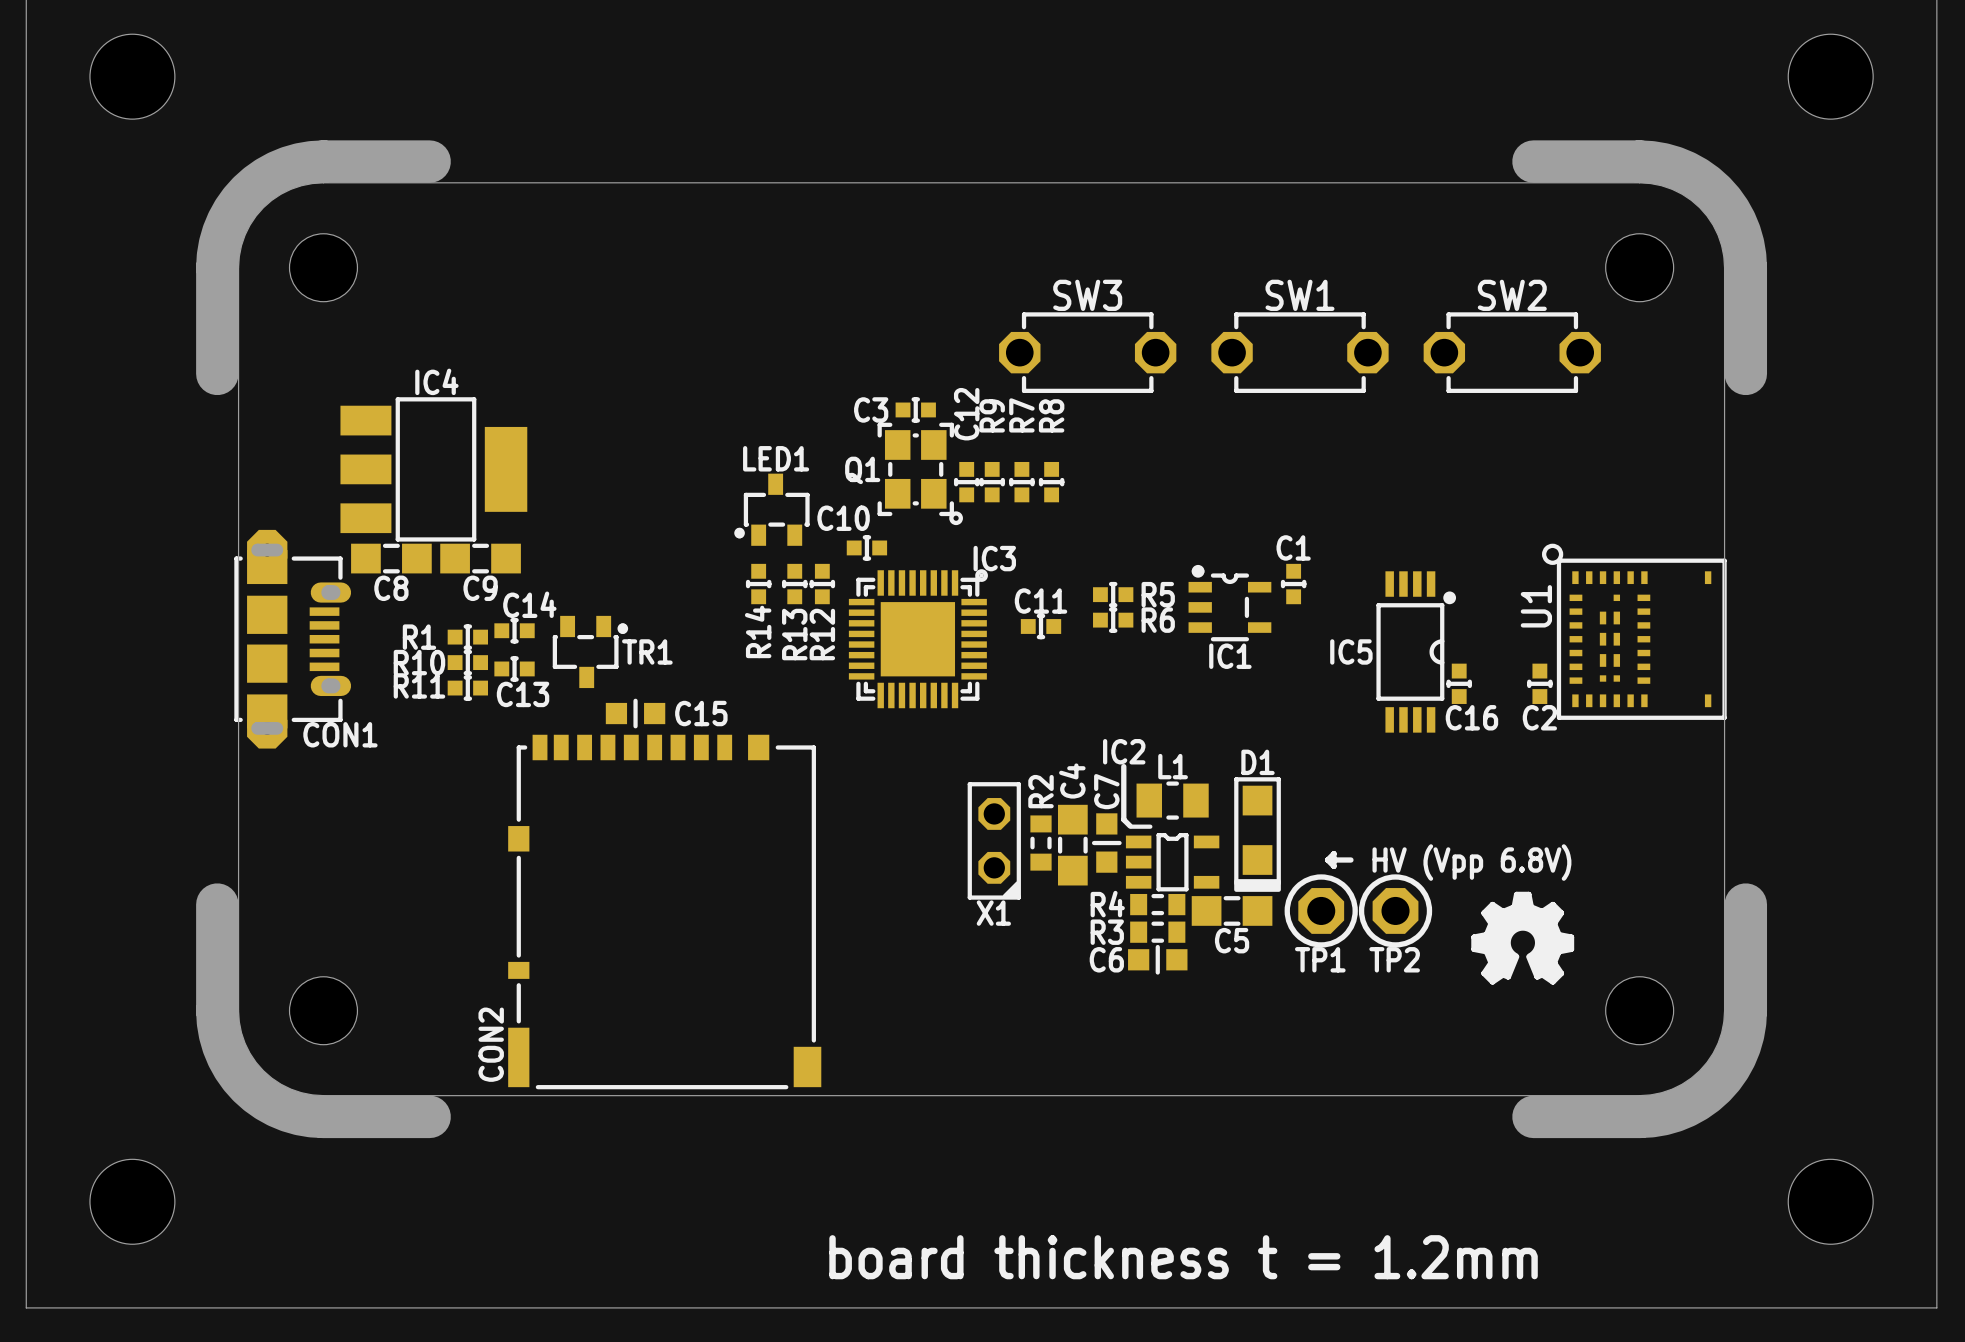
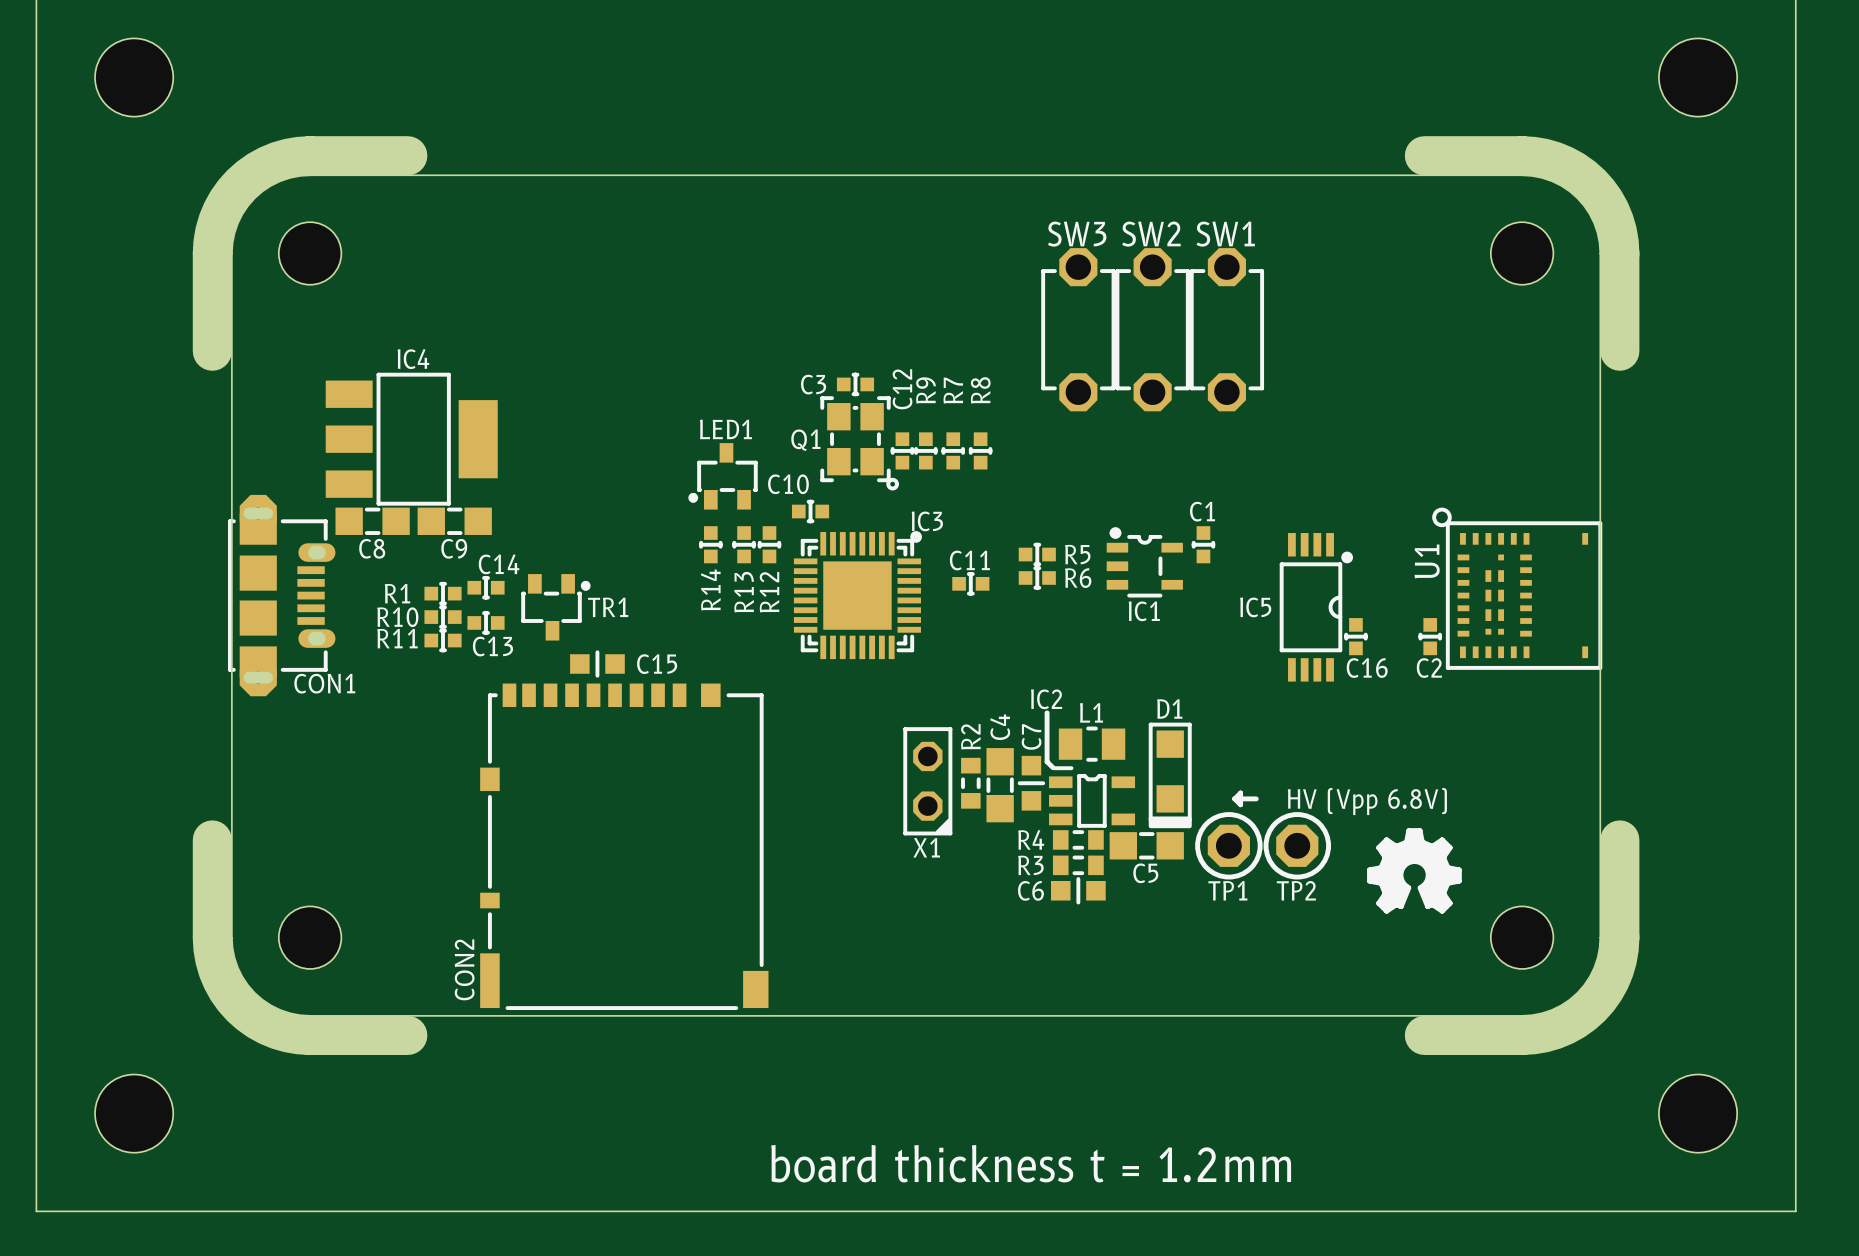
SW3 name position: SW3 (1087, 295) -> SW3 (1077, 234)
SW1 name position: SW1 (1299, 295) -> SW1 (1225, 234)
SW2 name position: SW2 (1512, 295) -> SW2 (1151, 234)
SW3 rotation: 0° (1087, 352) -> 90° clockwise (1078, 329)
SW1 rotation: 0° (1299, 352) -> 90° clockwise (1226, 329)
SW2 rotation: 0° (1512, 352) -> 90° clockwise (1152, 329)
SW2 position: (1512, 352) -> (1152, 329)

